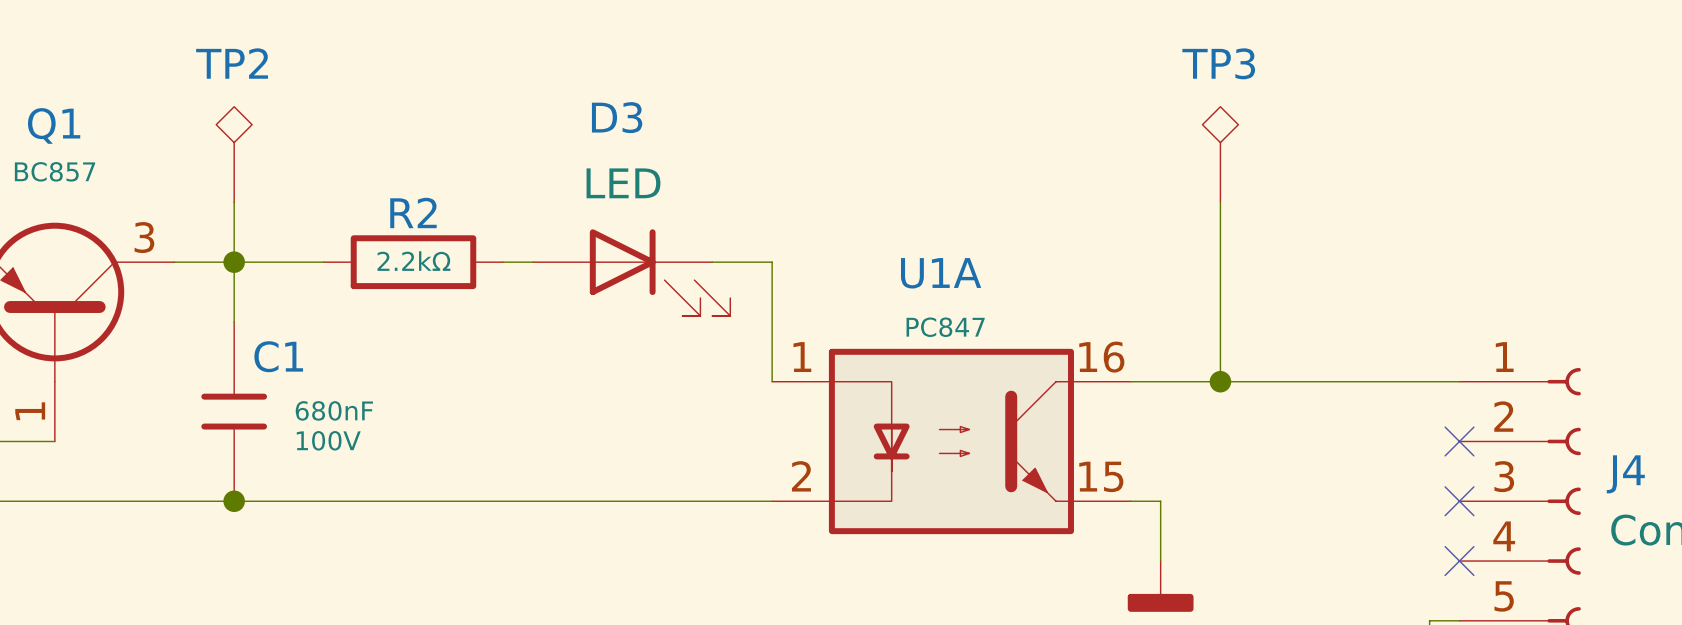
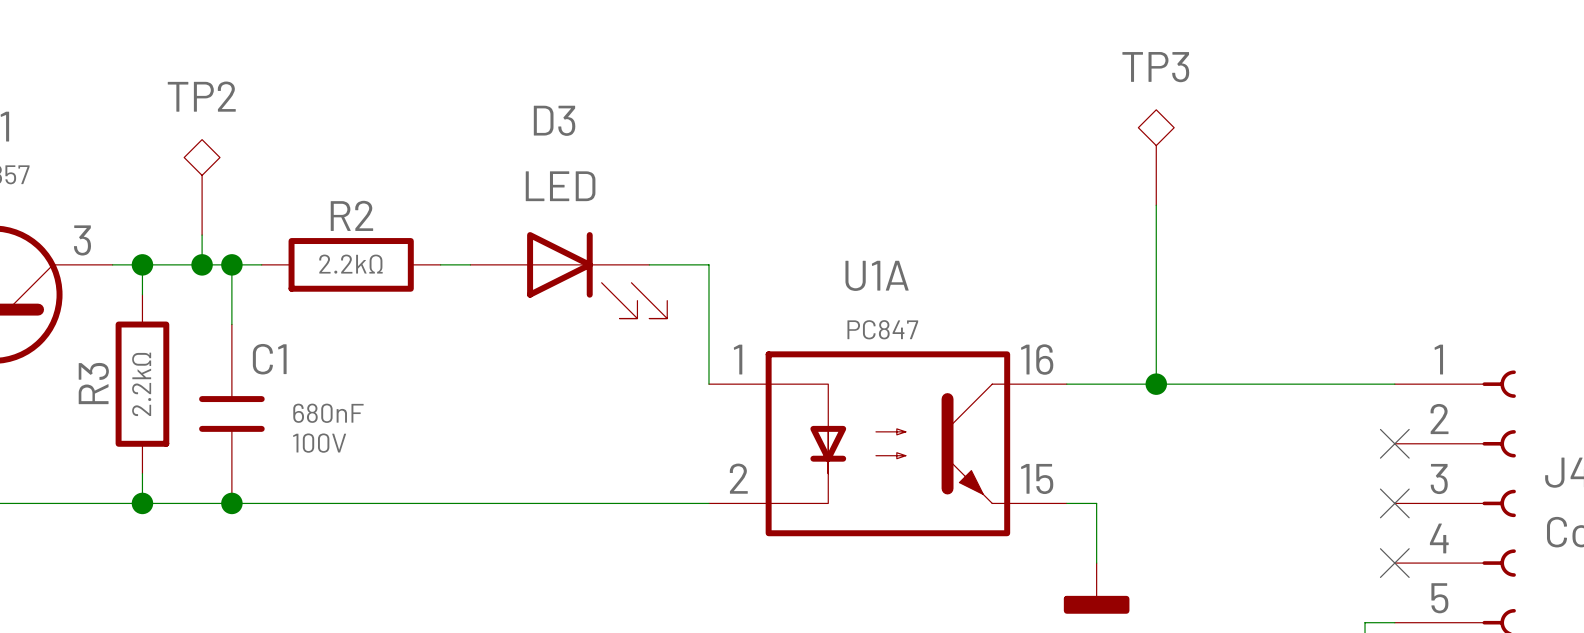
TP2 position: (234, 154) -> (202, 187)
wire: (234, 202) (234, 321) -> none
wire: none -> (202, 235) (202, 264)
wire: none -> (142, 264) (142, 294)
junction: none -> (142, 264)
junction: (234, 262) -> none
junction: none -> (202, 264)
wire: none -> (231, 264) (231, 324)
junction: none -> (231, 264)
R3: none -> 2.2kΩ (142, 384)
C1 position: (234, 411) -> (231, 413)
wire: none -> (142, 473) (142, 503)
junction: none -> (142, 503)
junction: (234, 501) -> none
junction: none -> (231, 503)

